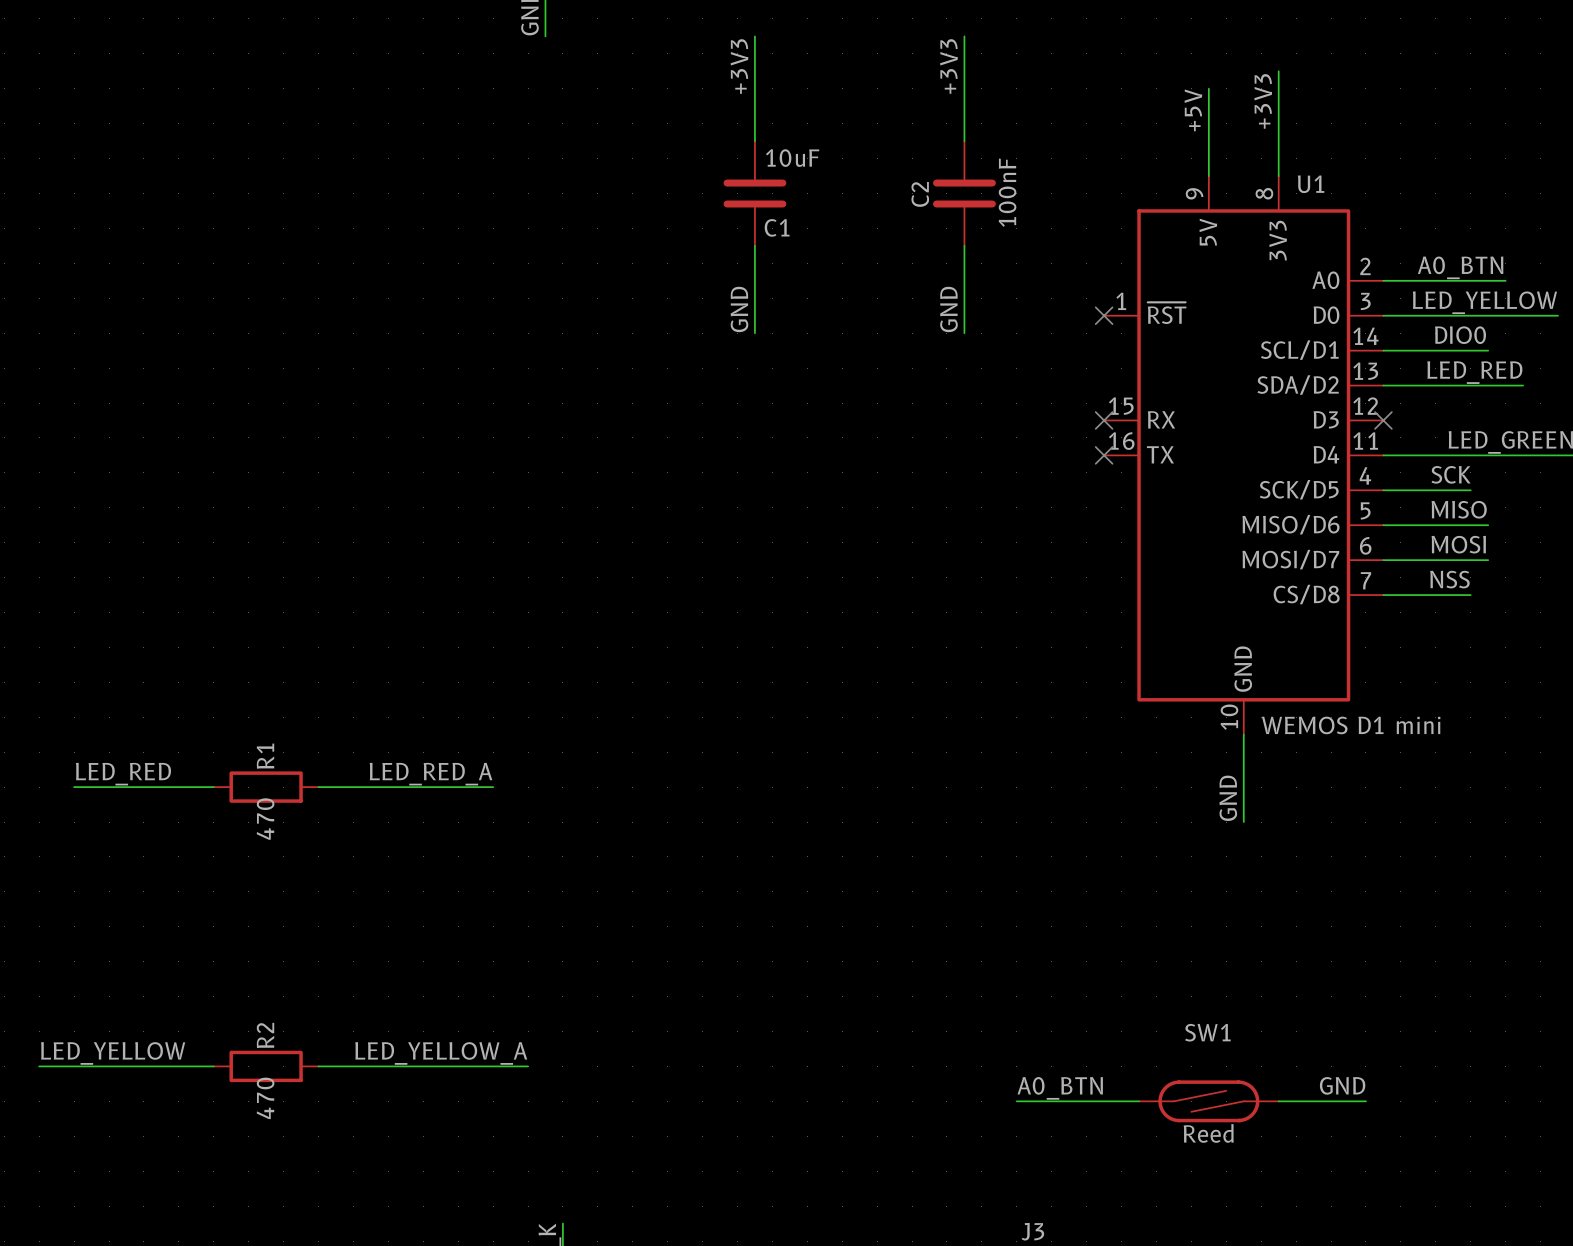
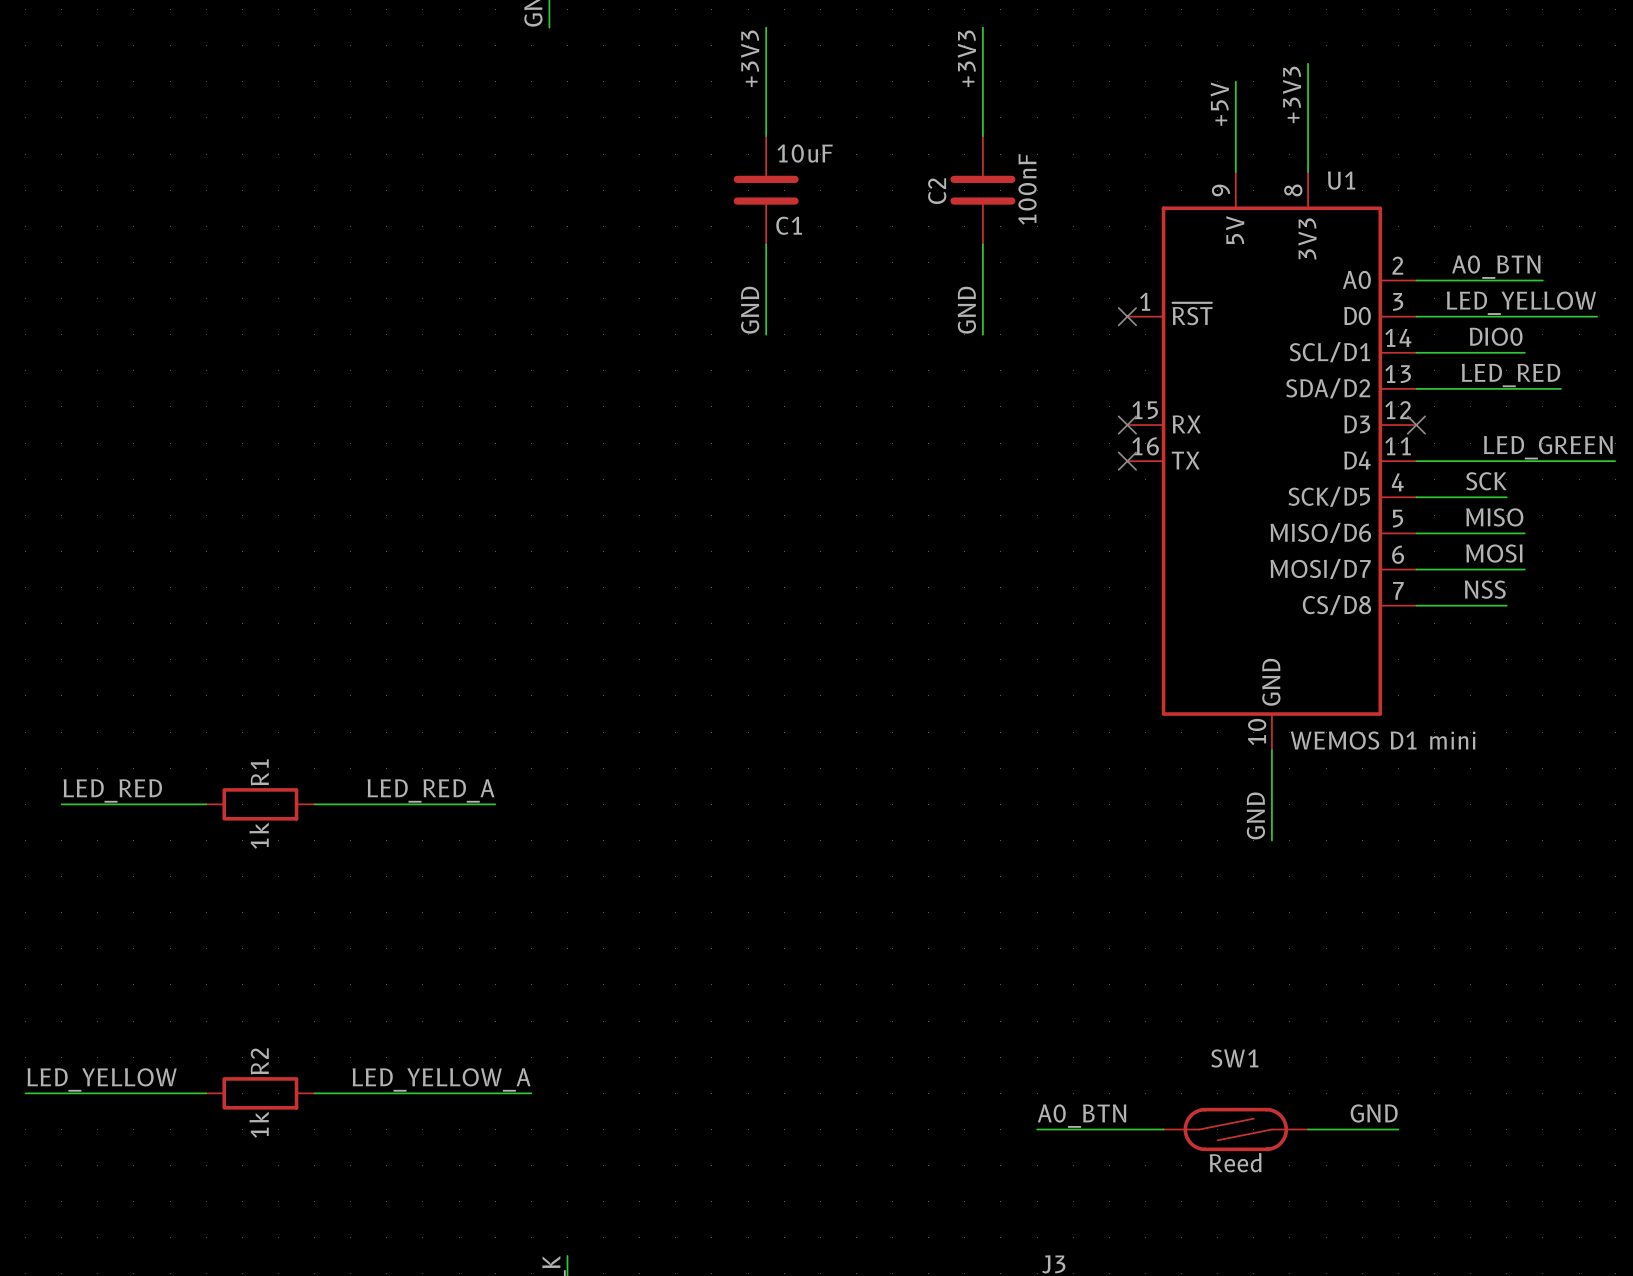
R1 value: 470 (265, 819) -> 1k (259, 835)
R2 value: 470 (265, 1098) -> 1k (259, 1124)

